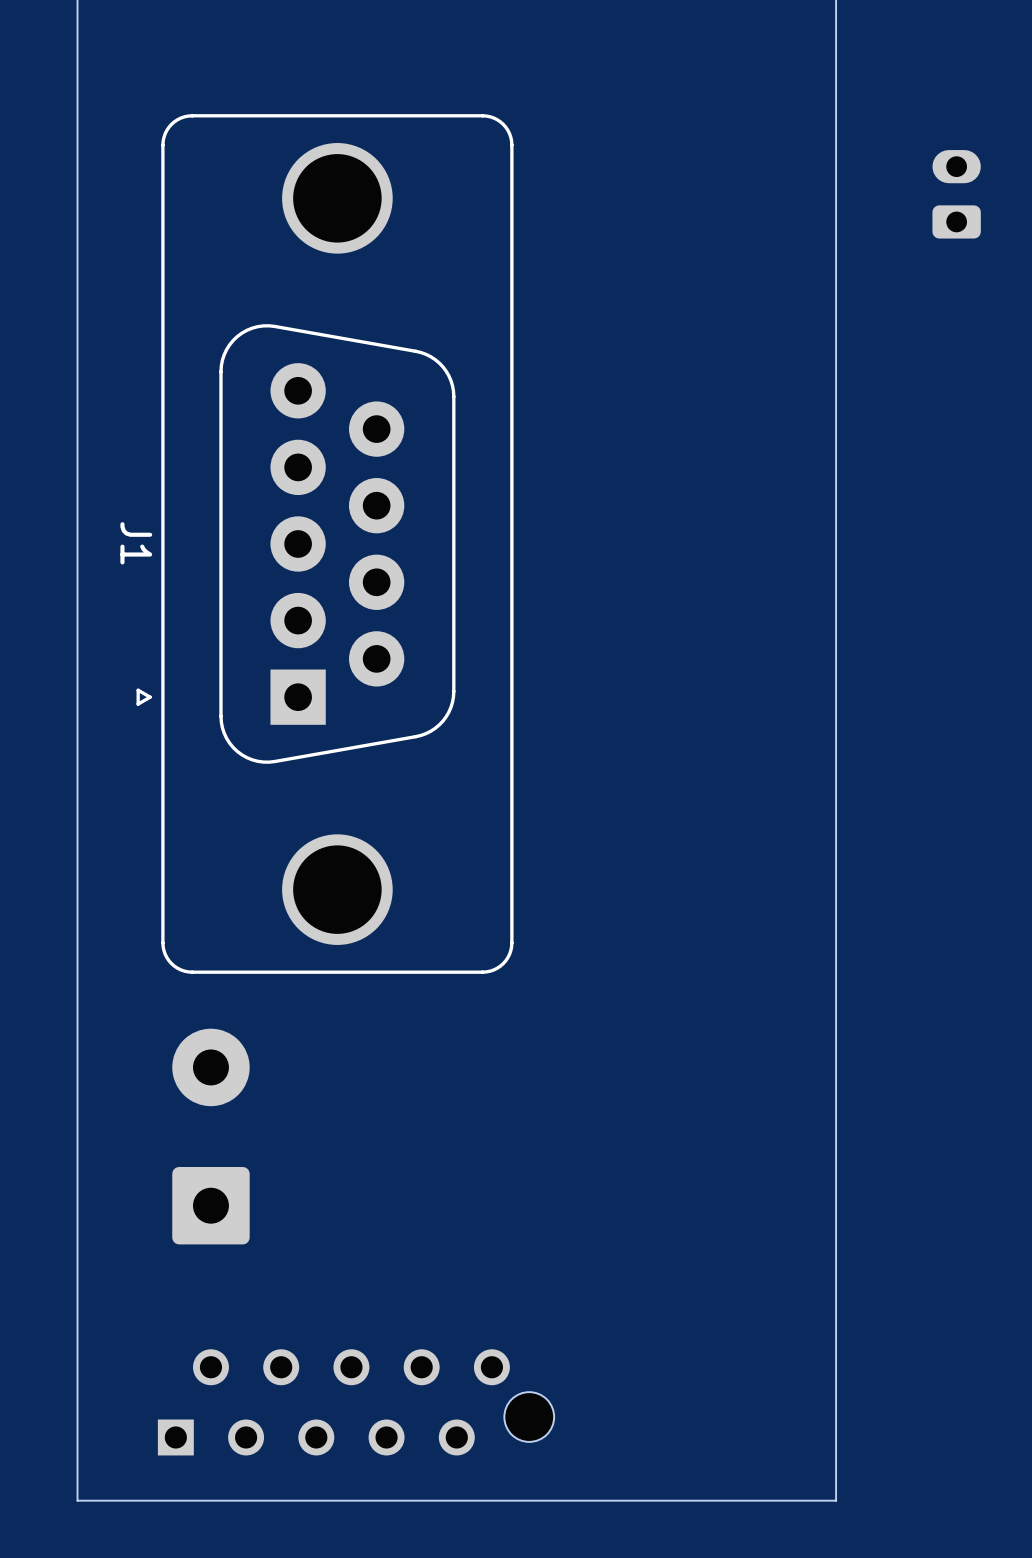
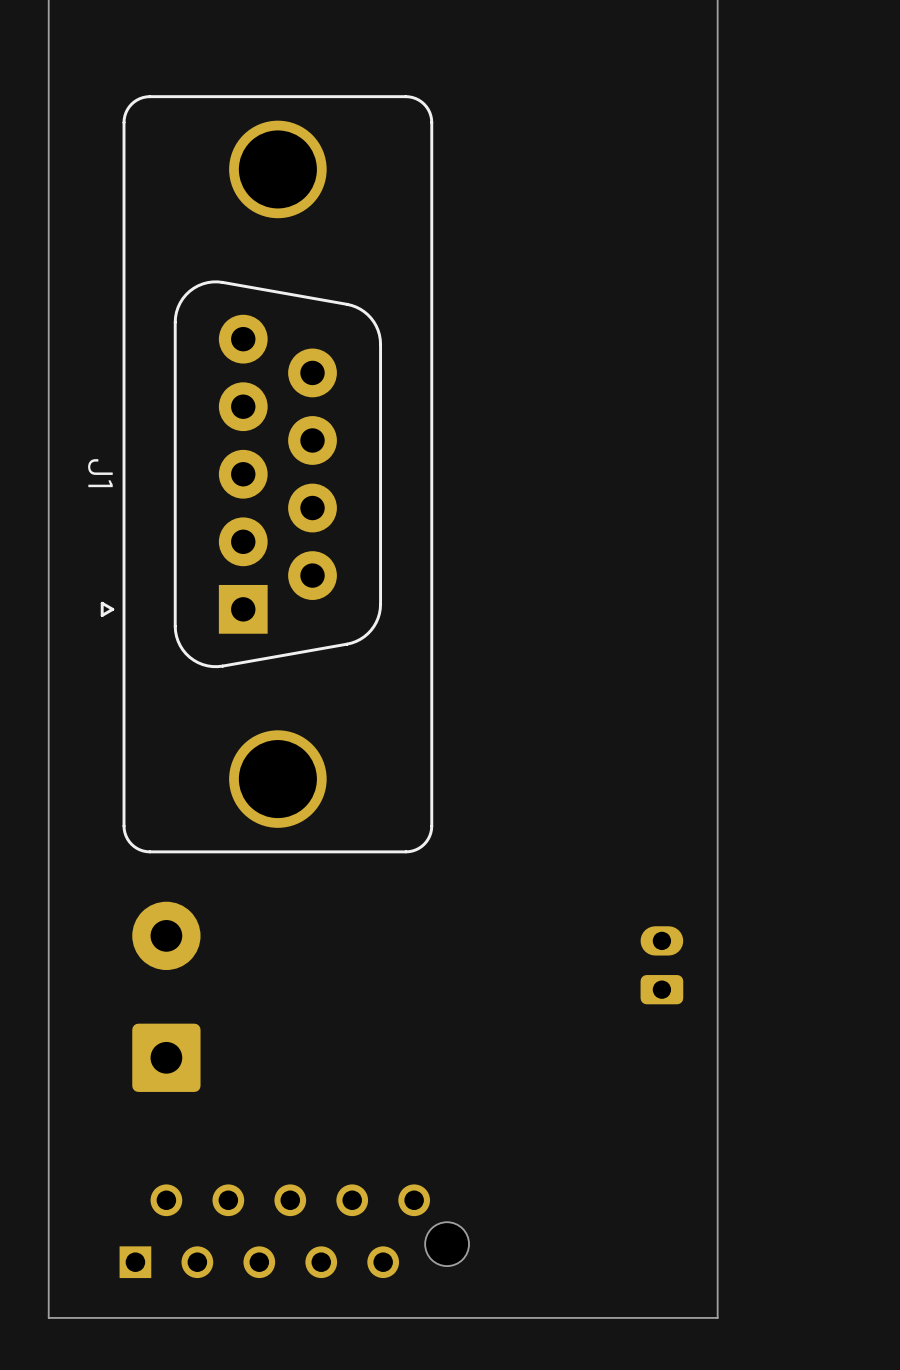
part: (956, 194) -> none
part: none -> (661, 965)

